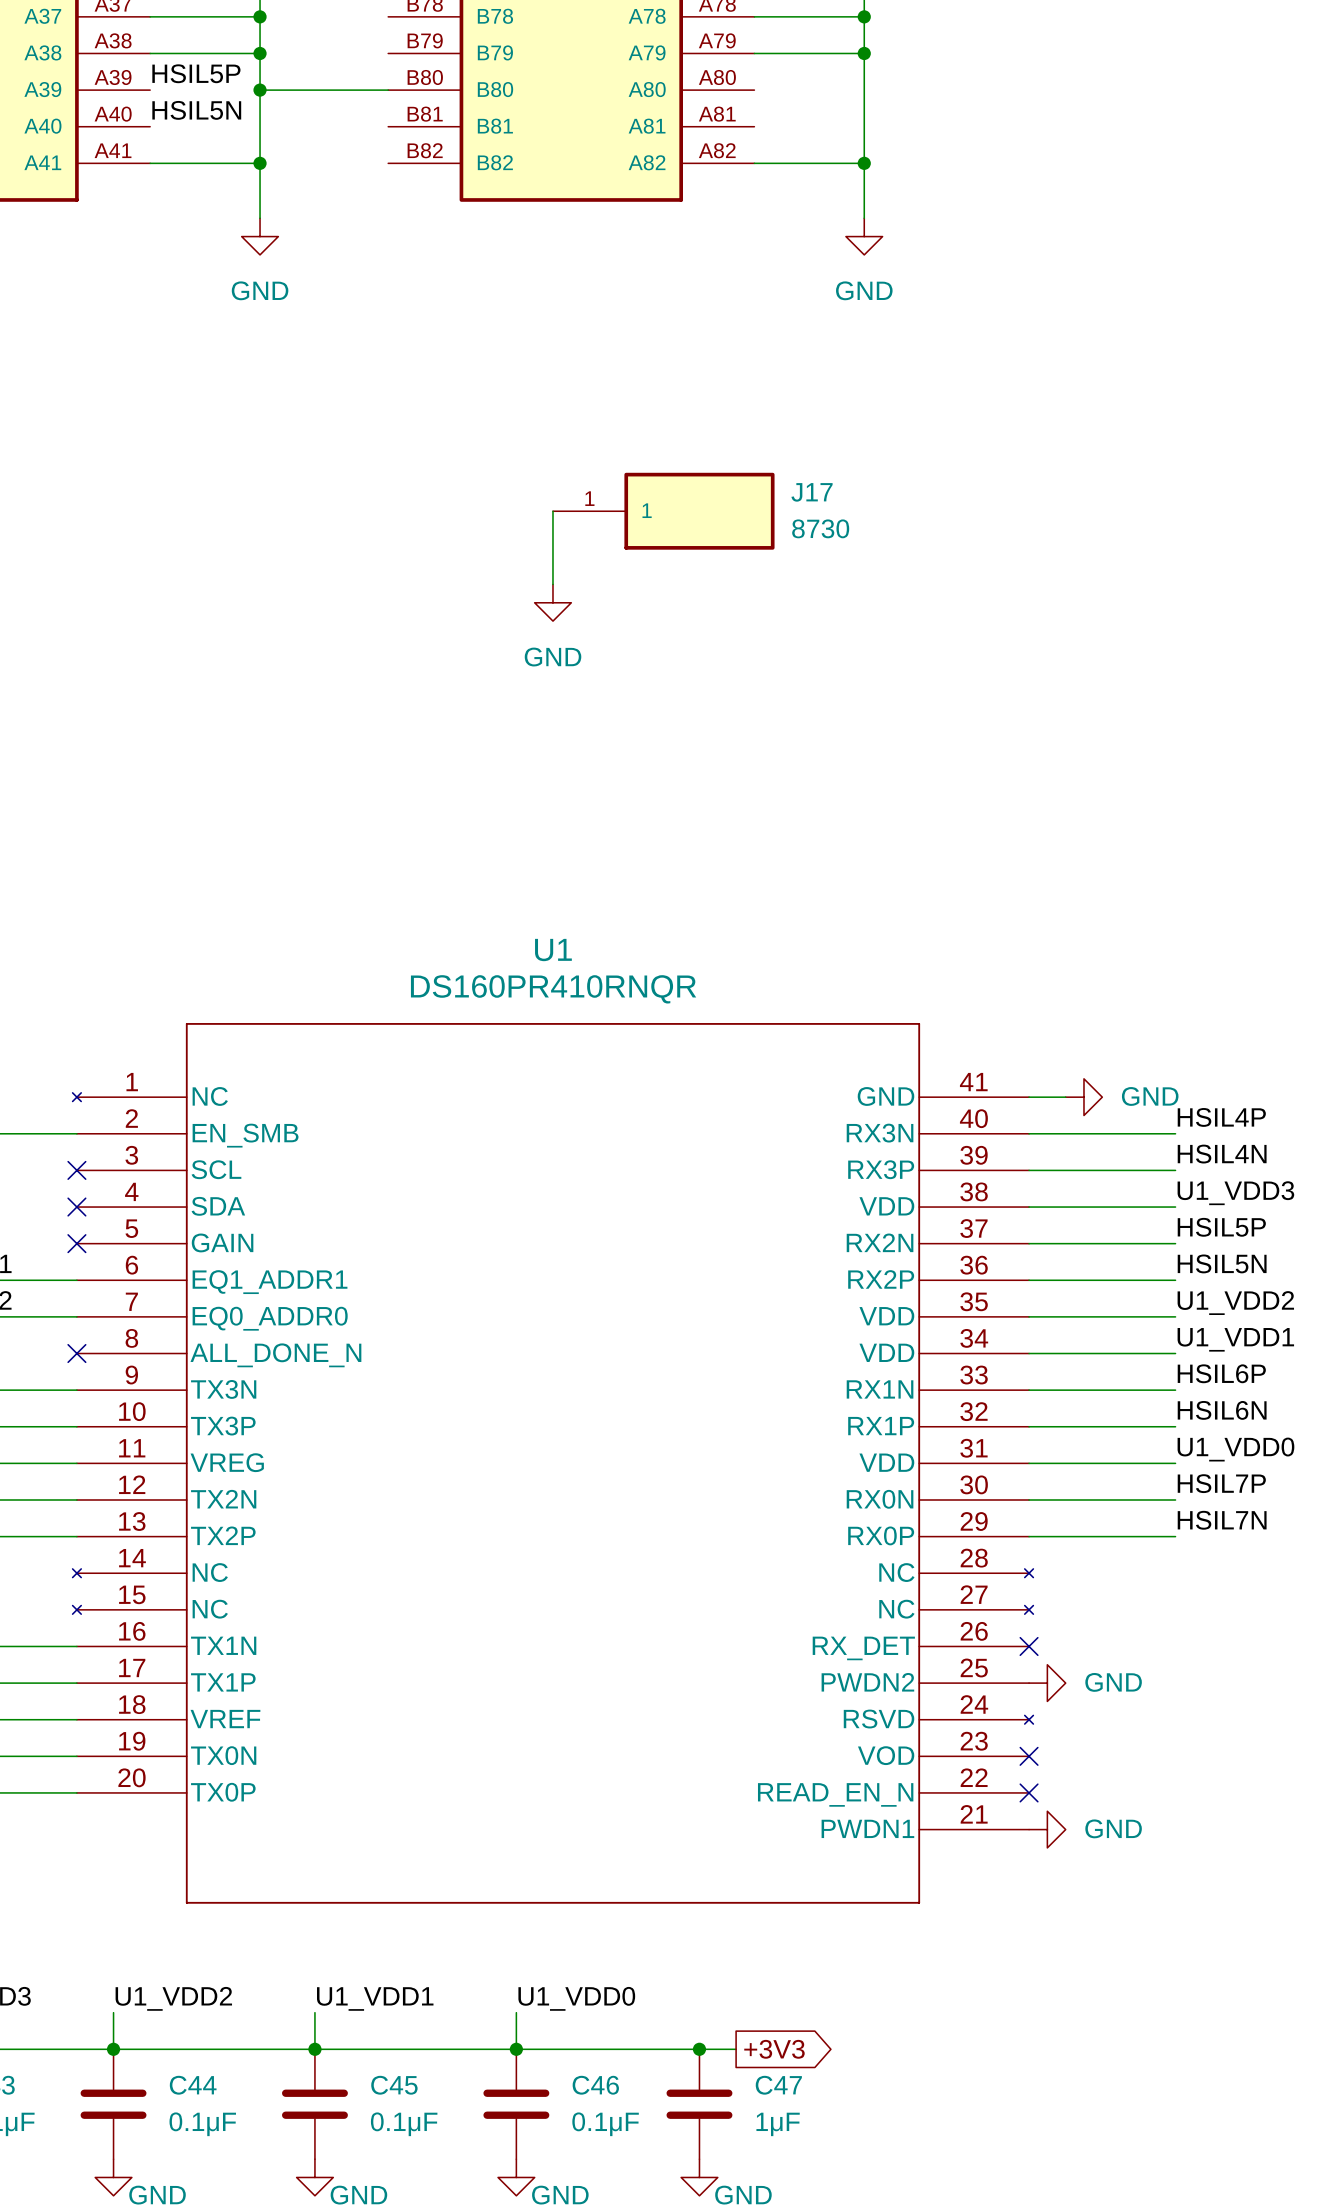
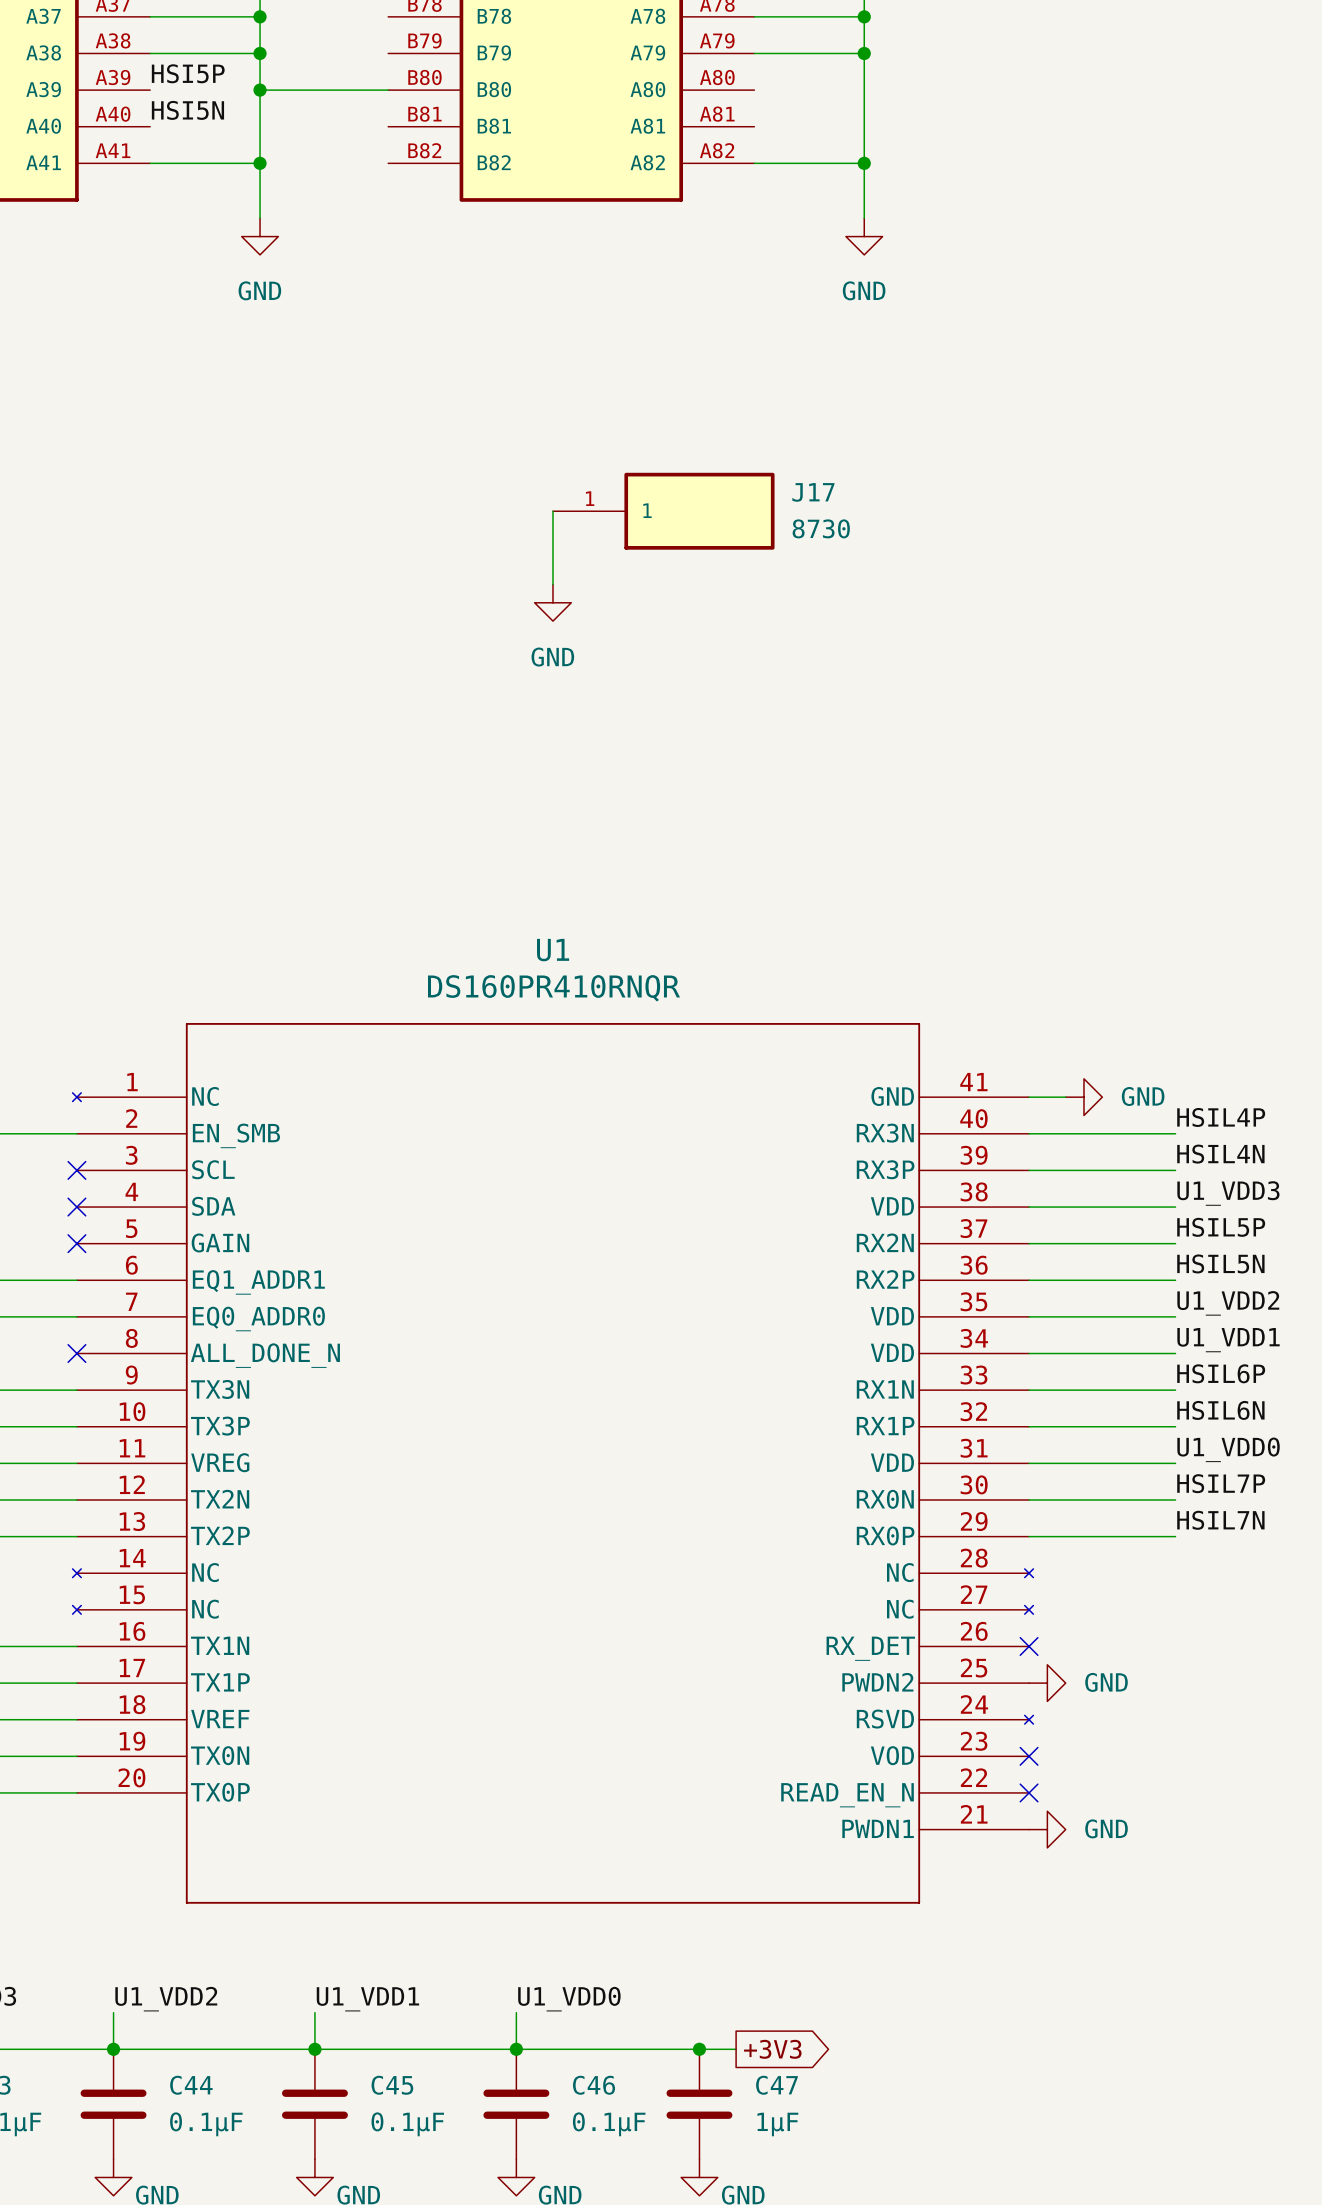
label: HSIL5P (196, 73) -> HSI5P (188, 73)
label: HSIL5N (196, 110) -> HSI5N (187, 110)

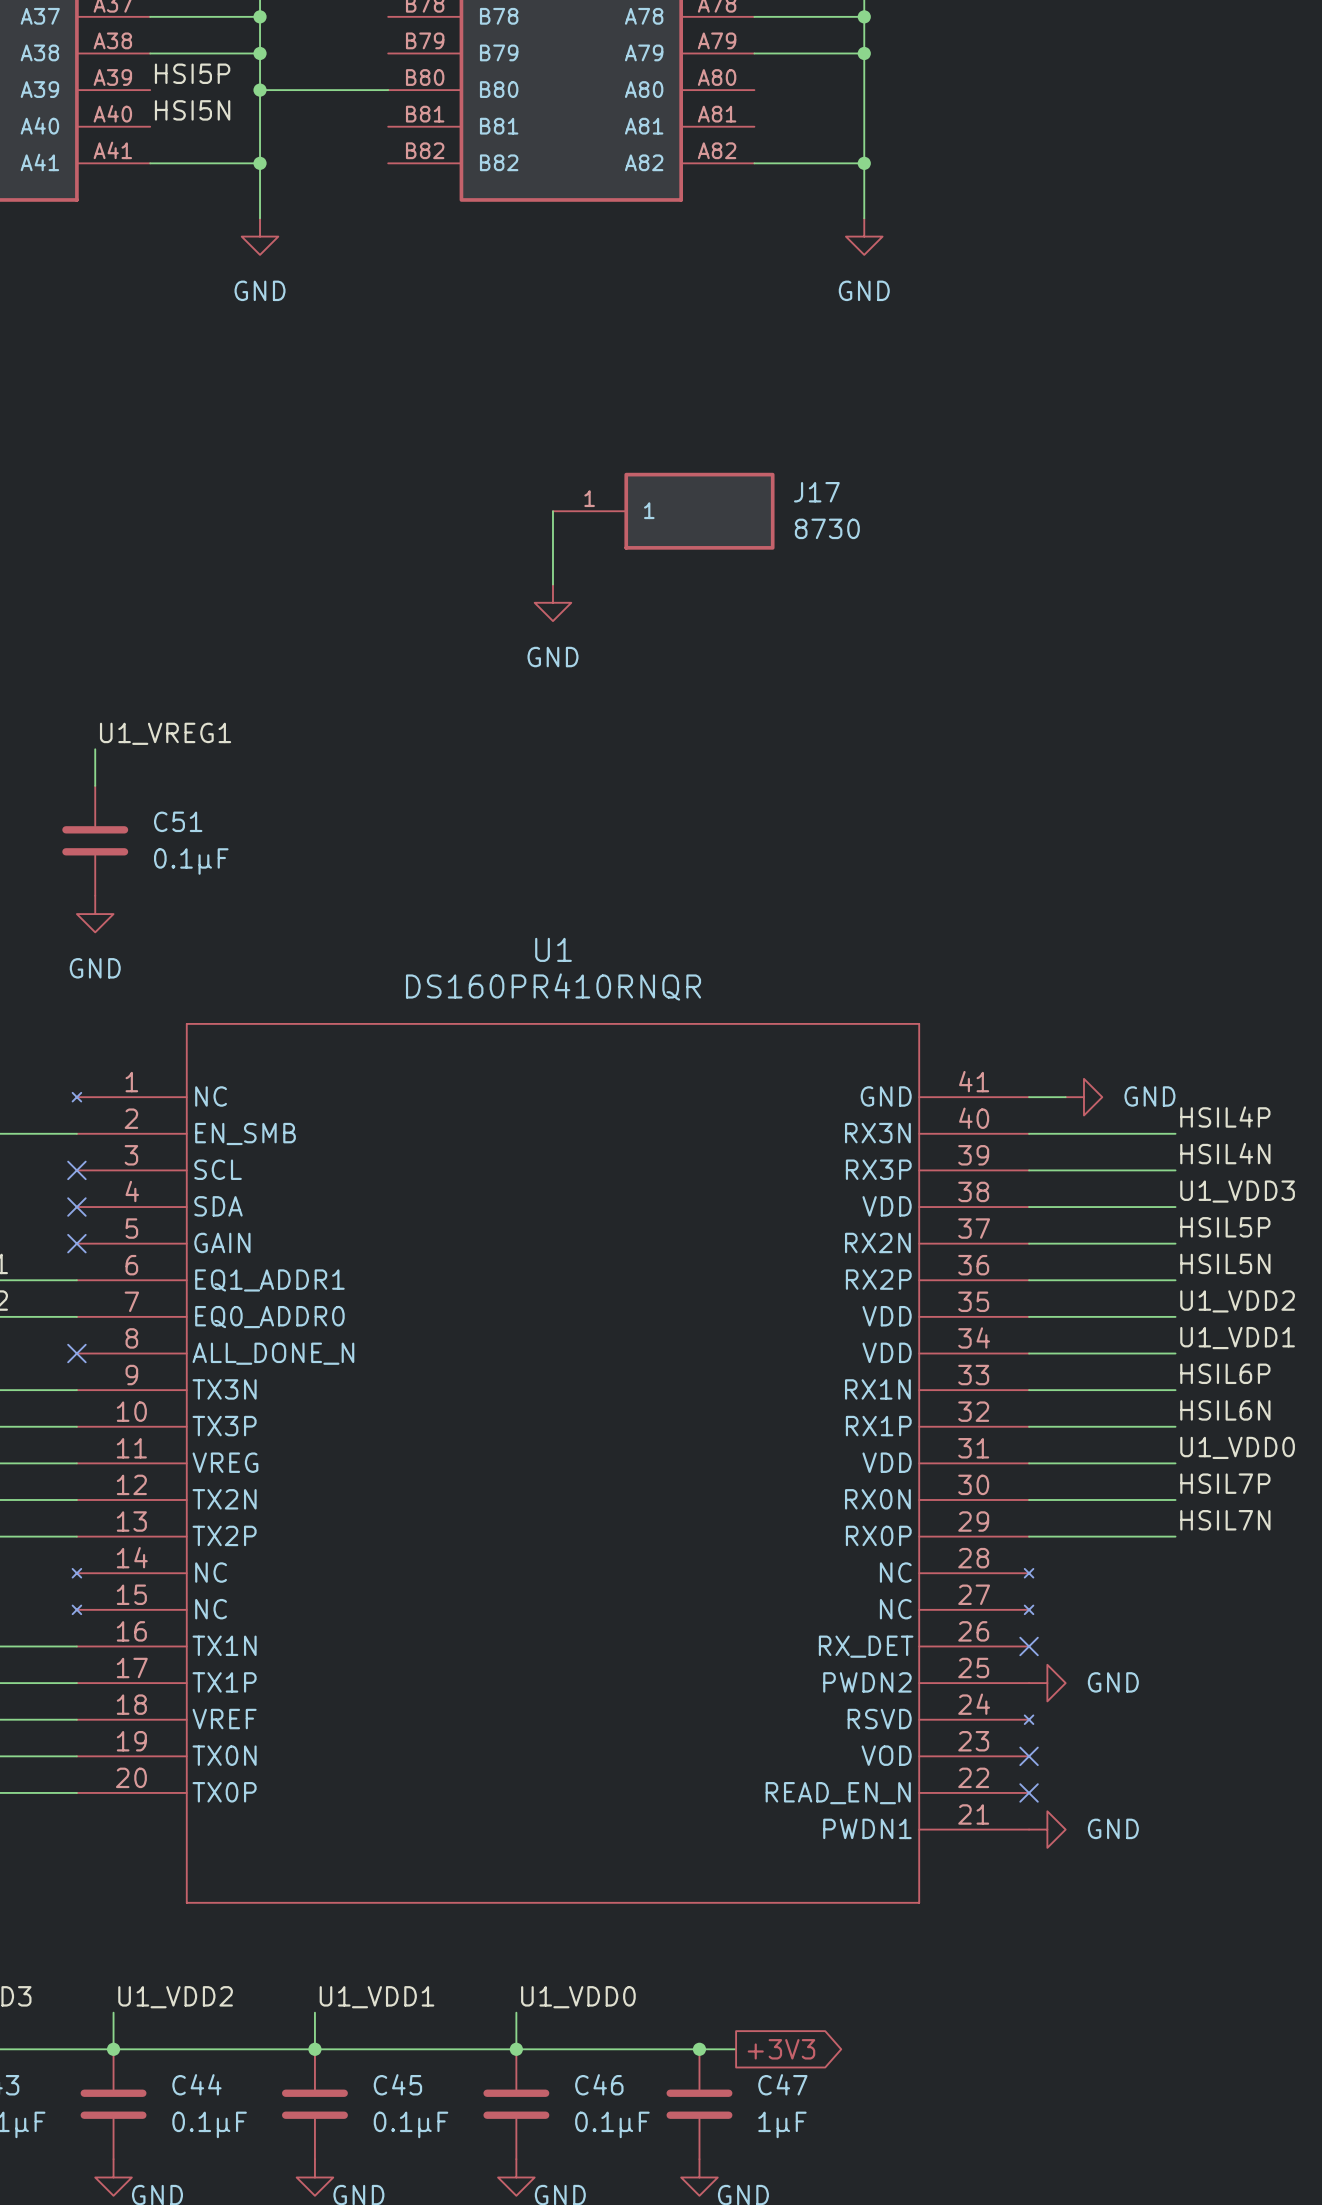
label: none -> U1_VREG1 (165, 733)
wire: none -> (95, 749) (95, 785)
C51: none -> 0.1μF (95, 840)
power symbol: none -> GND (95, 914)

